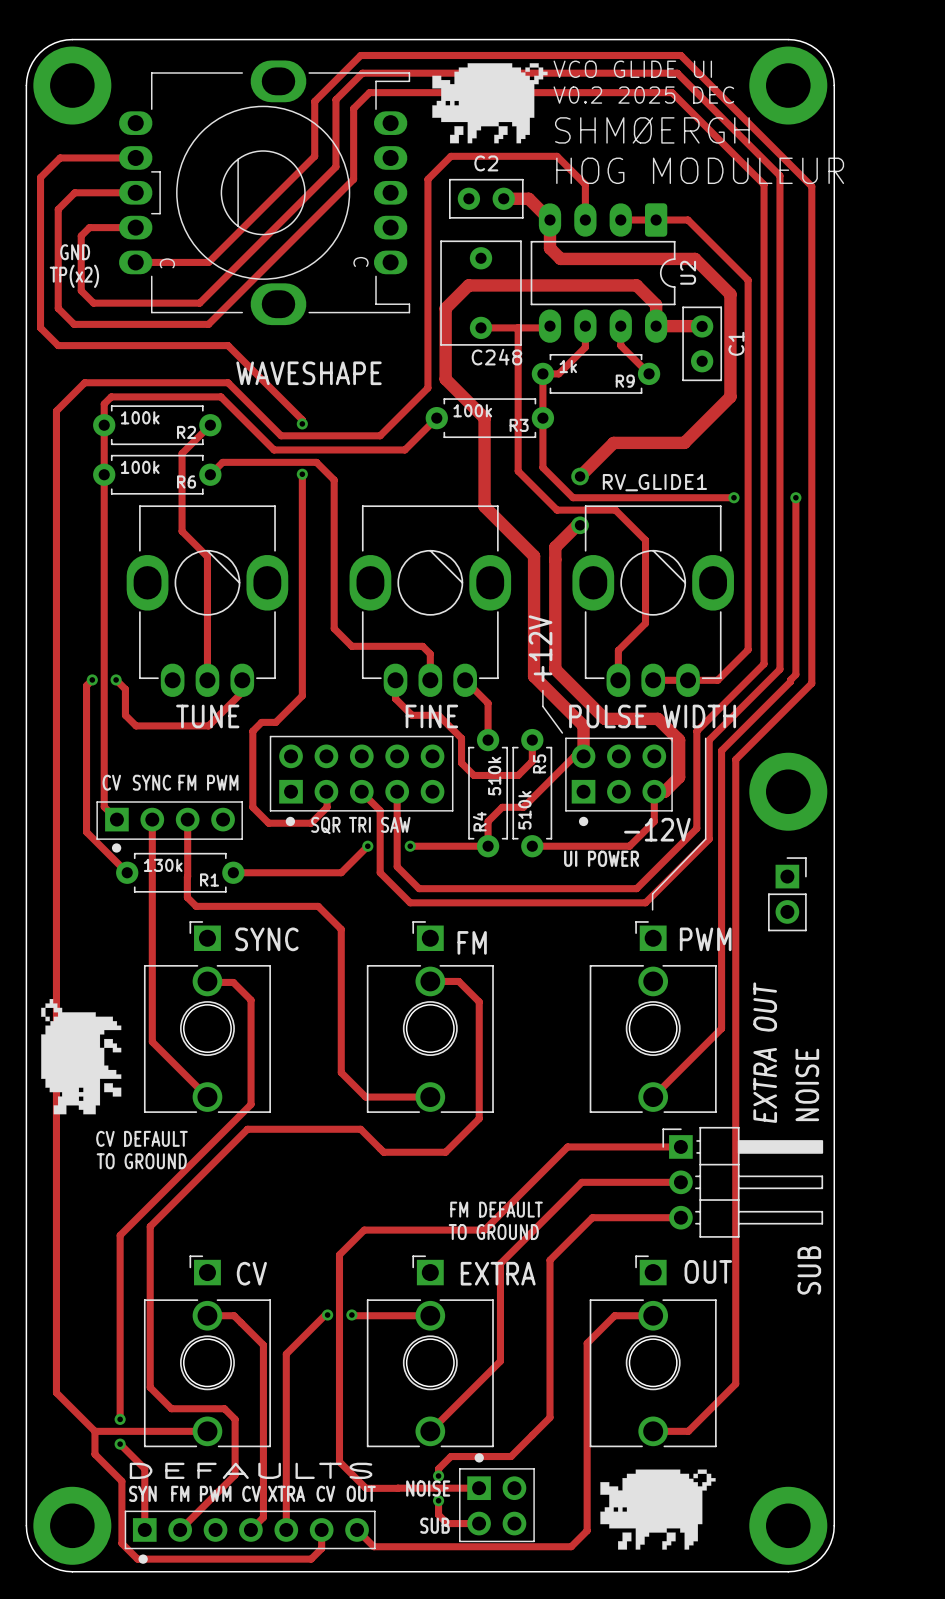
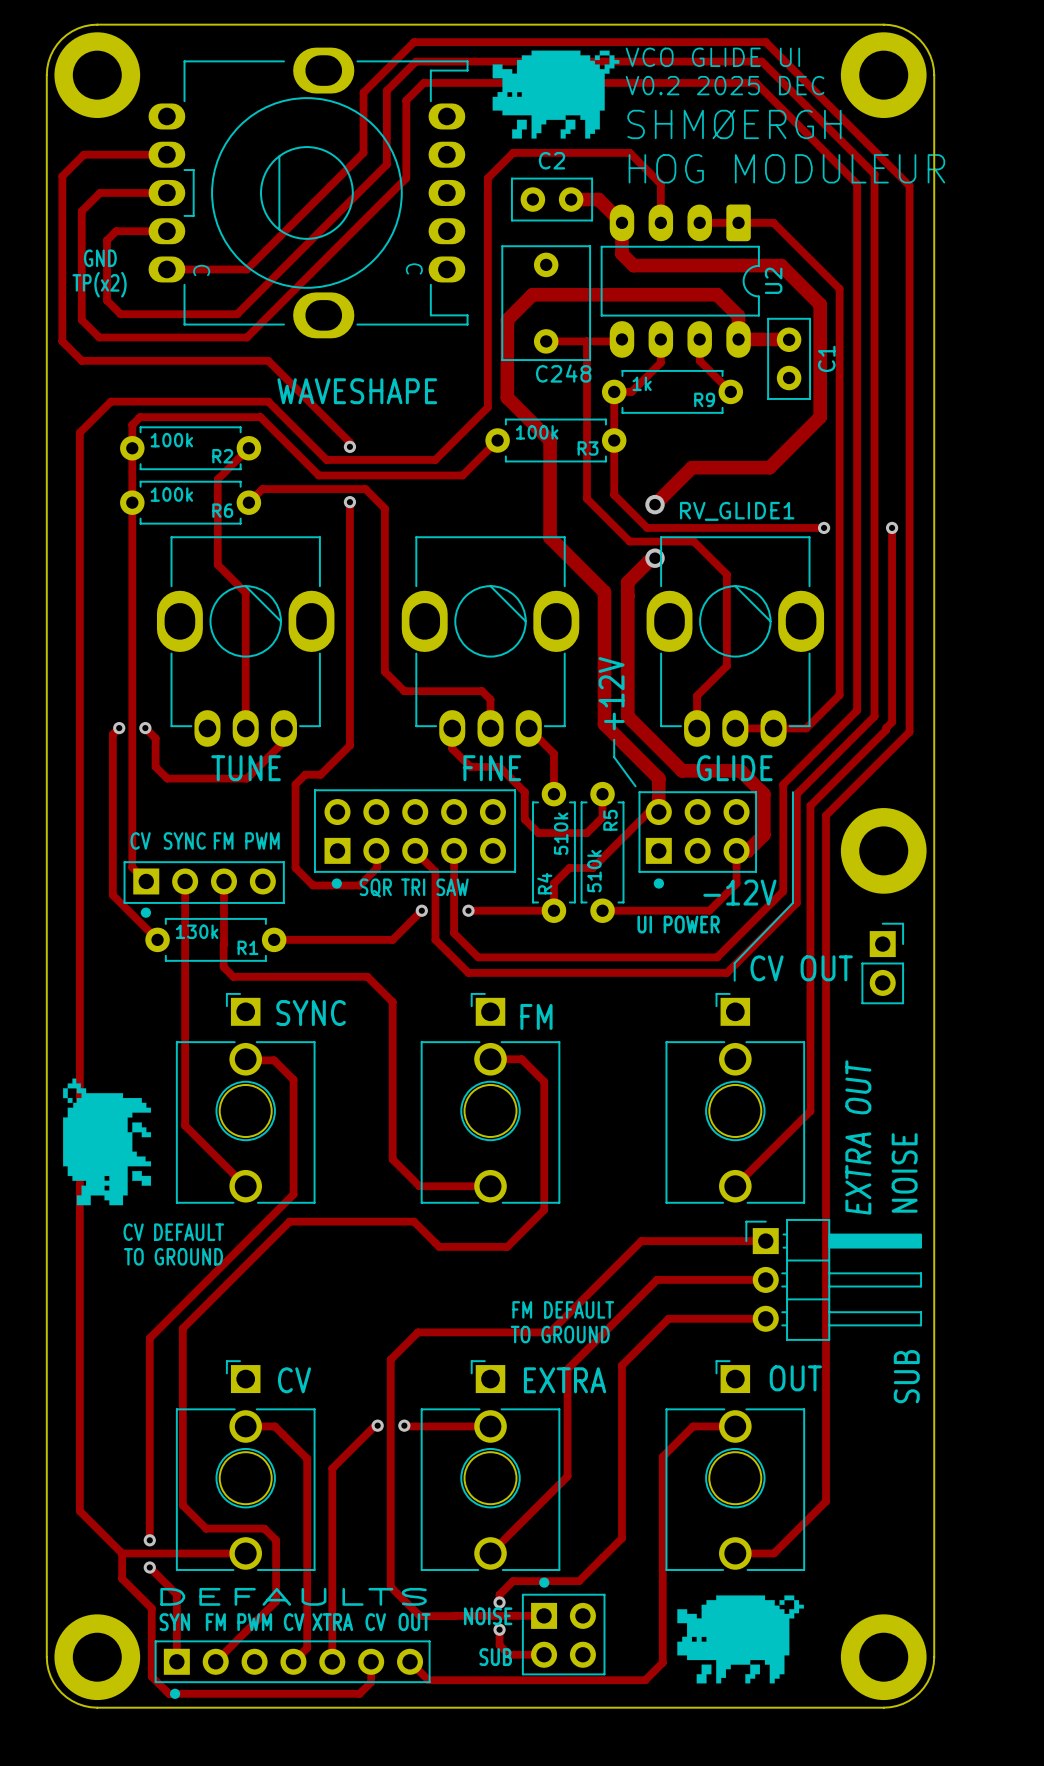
text: PULSE WIDTH (652, 716) -> GLIDE (734, 768)
text: none -> CV OUT (801, 968)
text: PWM (705, 939) -> none

